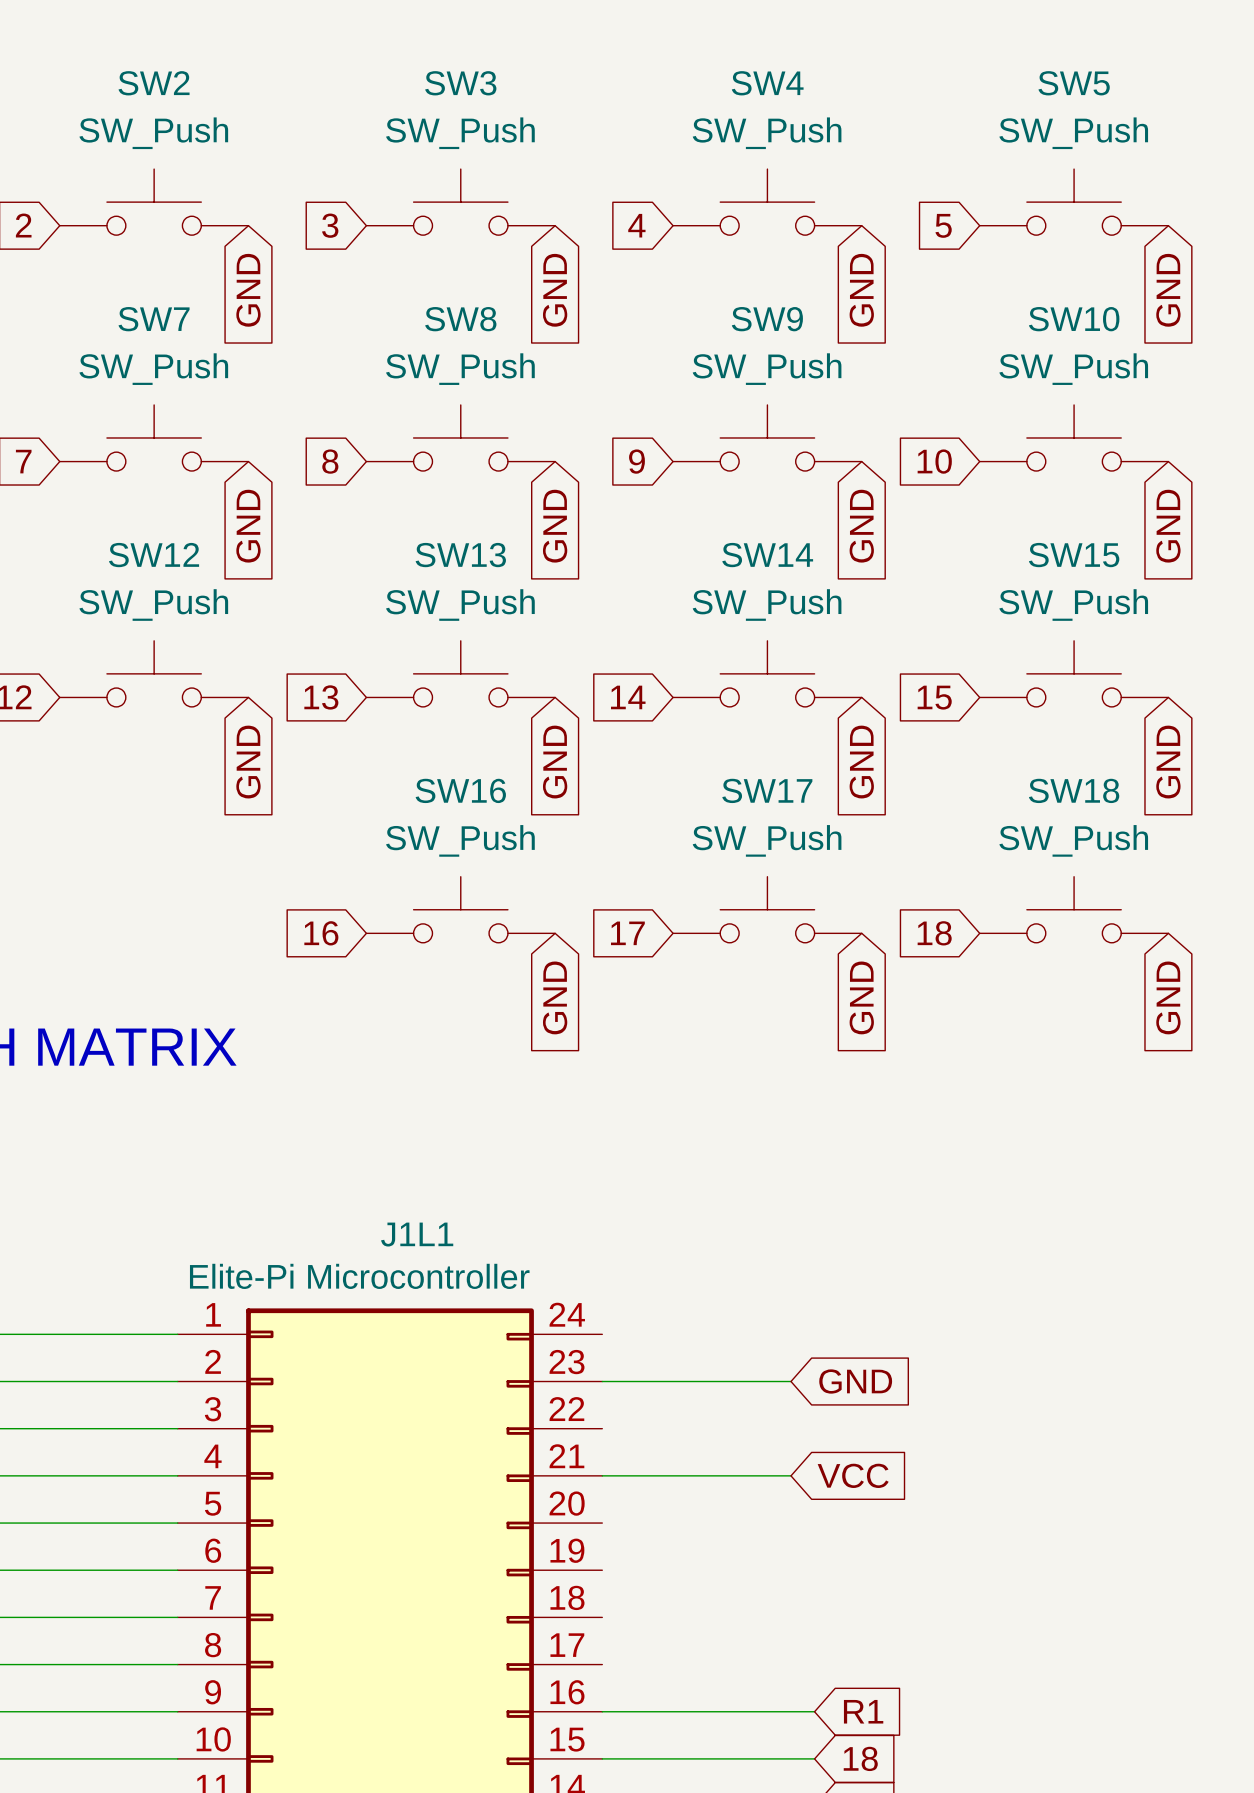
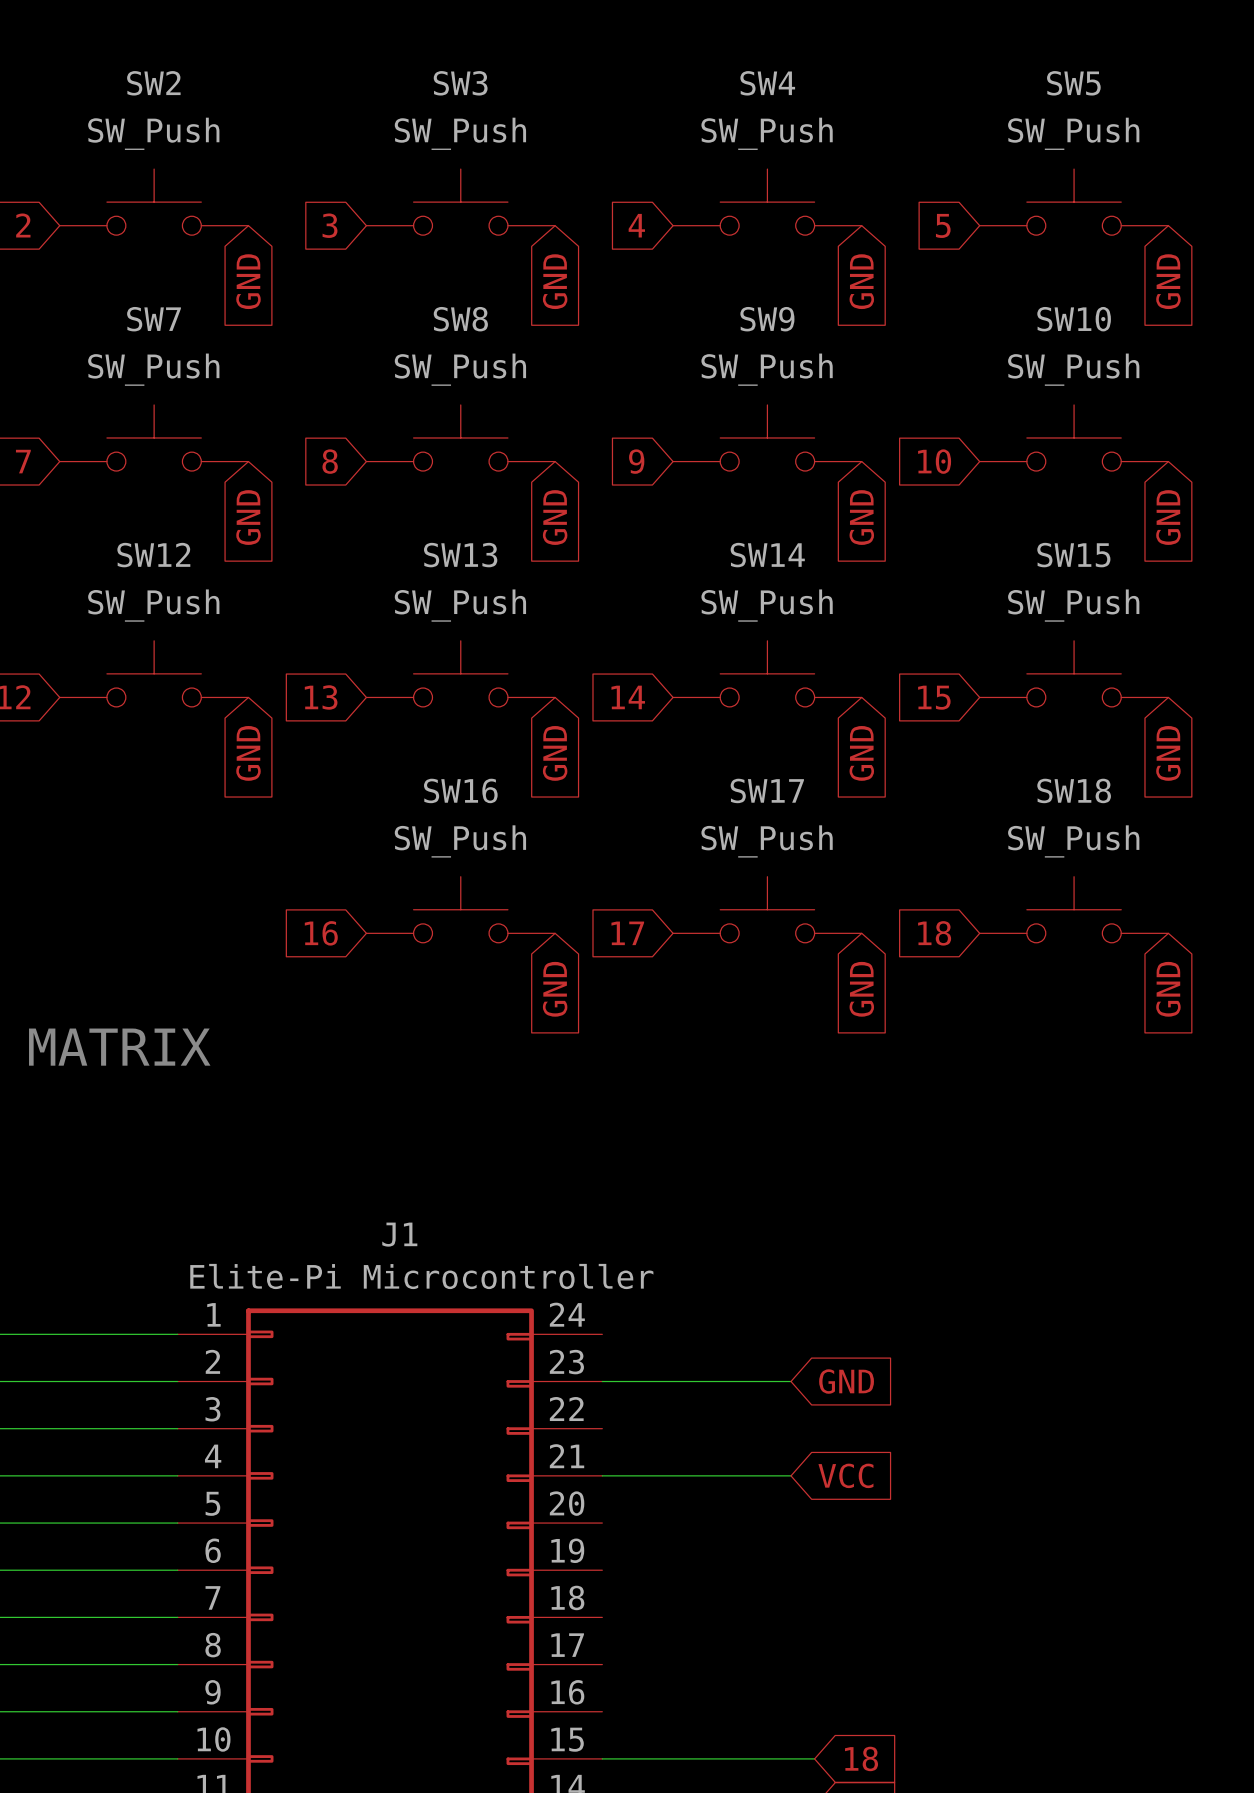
J1L1 name: J1L1 (417, 1234) -> J1 (399, 1234)
wire: (602, 1711) (814, 1711) -> none
global label: R1 (863, 1711) -> none

